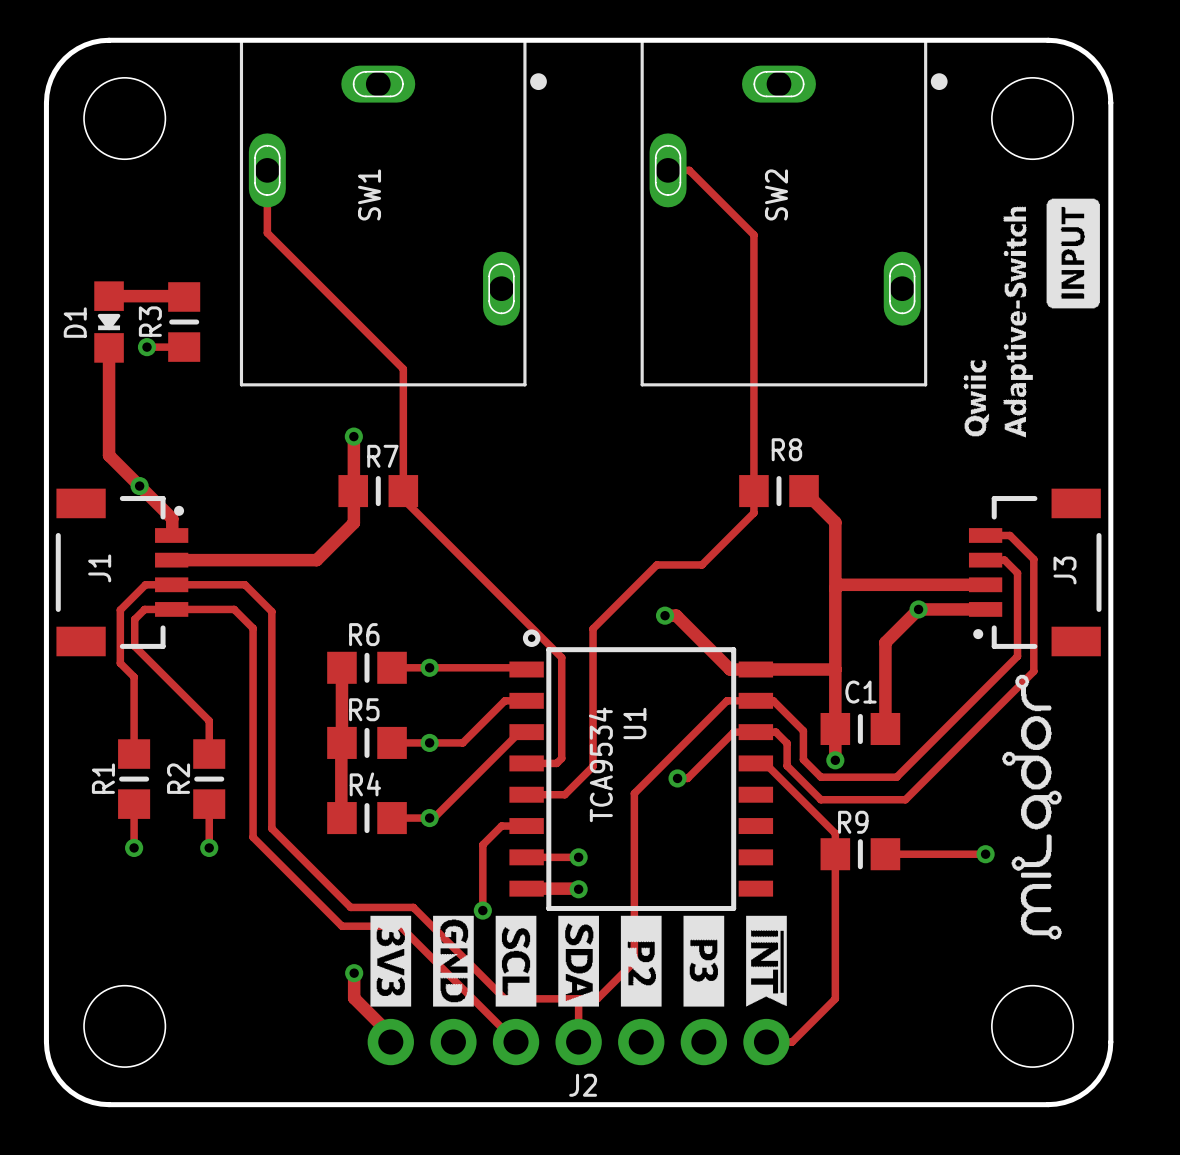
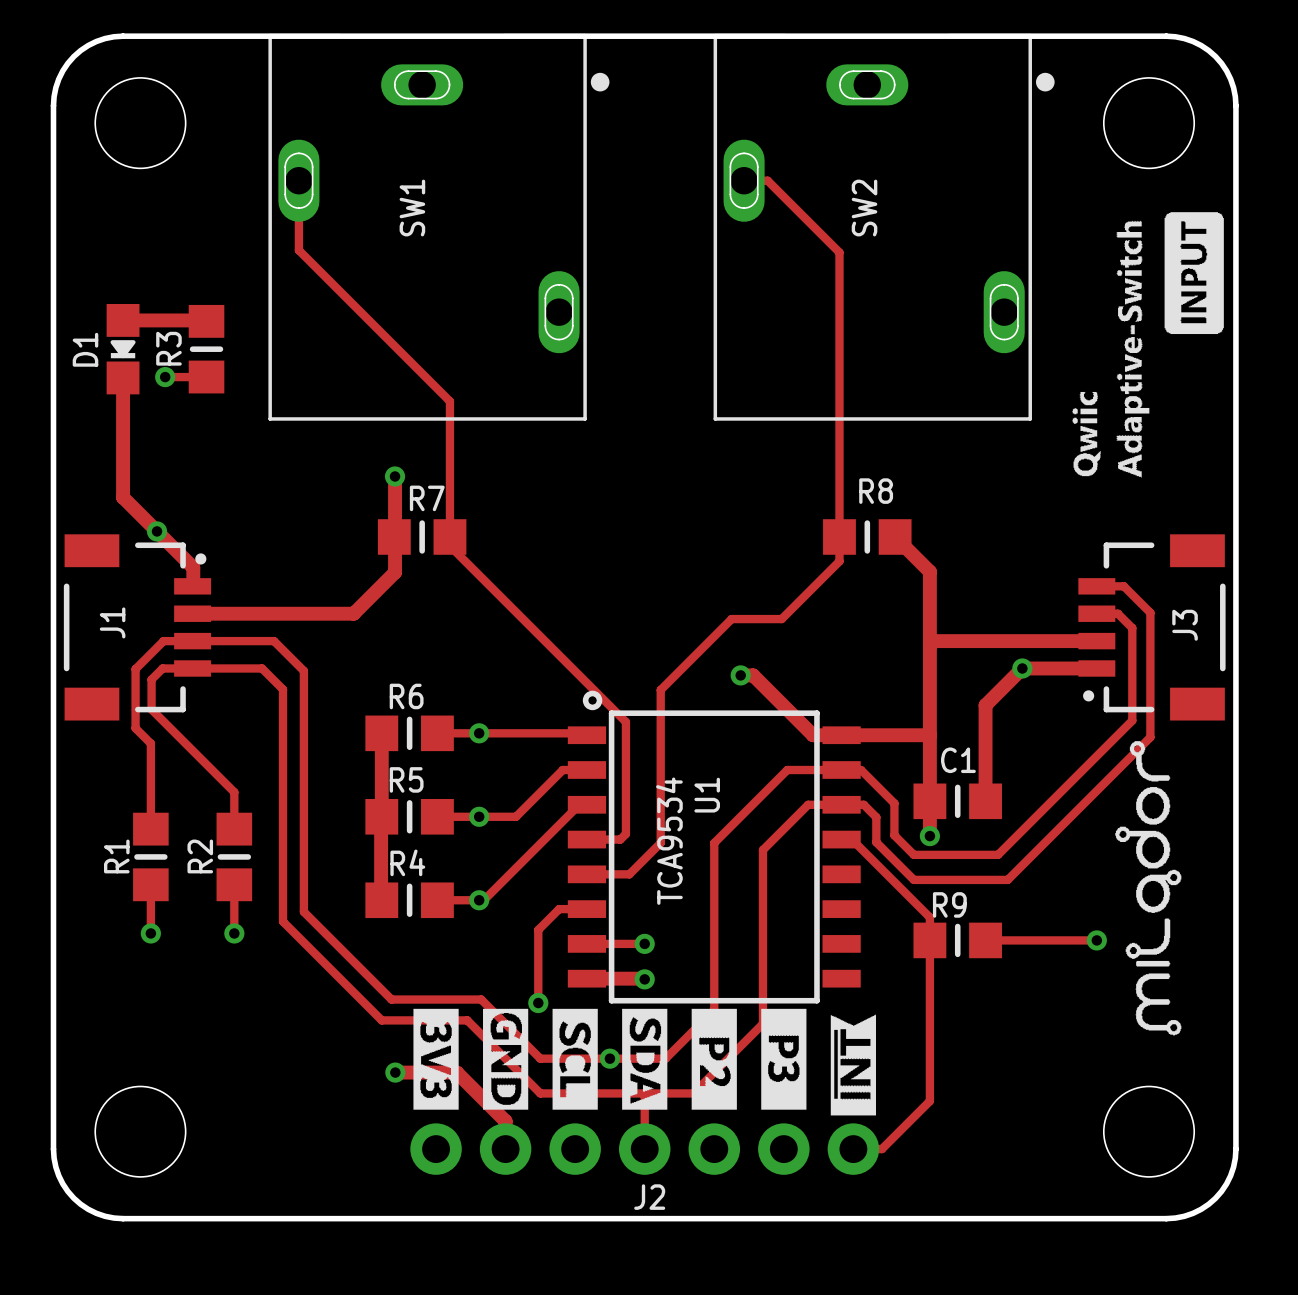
track: (727, 700) (634, 793) (634, 961) (597, 998) (504, 998) (413, 907) -> (809, 770) (787, 770) (714, 843) (714, 1009) (665, 1058) (540, 1058) (481, 999) (461, 999)
track: (733, 732) (687, 778) (677, 778) -> (817, 804) (808, 804) (762, 849) (762, 1023) (693, 1093) (540, 1093) (467, 1020) (446, 1020)
via: (677, 778) -> none
drawing shape: [746, 915, 787, 1007] -> [830, 1014, 877, 1116]
track: (400, 926) (516, 1042) -> none
via: none -> (609, 1058)
track: (354, 973) (354, 998) (390, 1034) (390, 1042) -> (395, 1072) (456, 1072) (505, 1121) (505, 1149)

